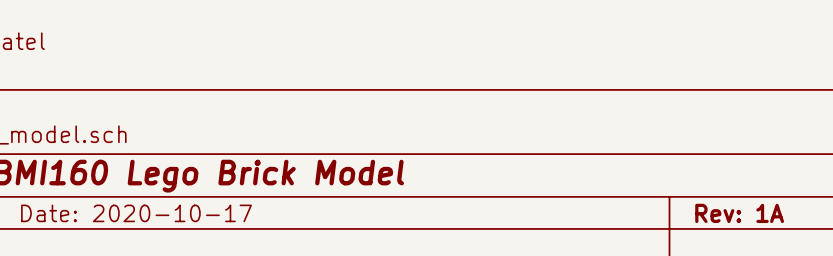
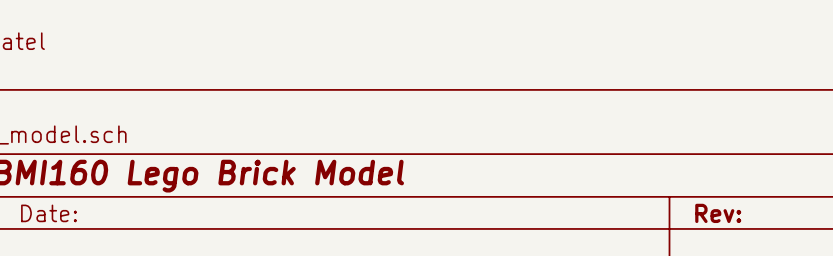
title block: Date: 2020-10-17 (136, 213) -> Date: (49, 213)
title block: Rev: 1A (739, 213) -> Rev: (718, 213)

